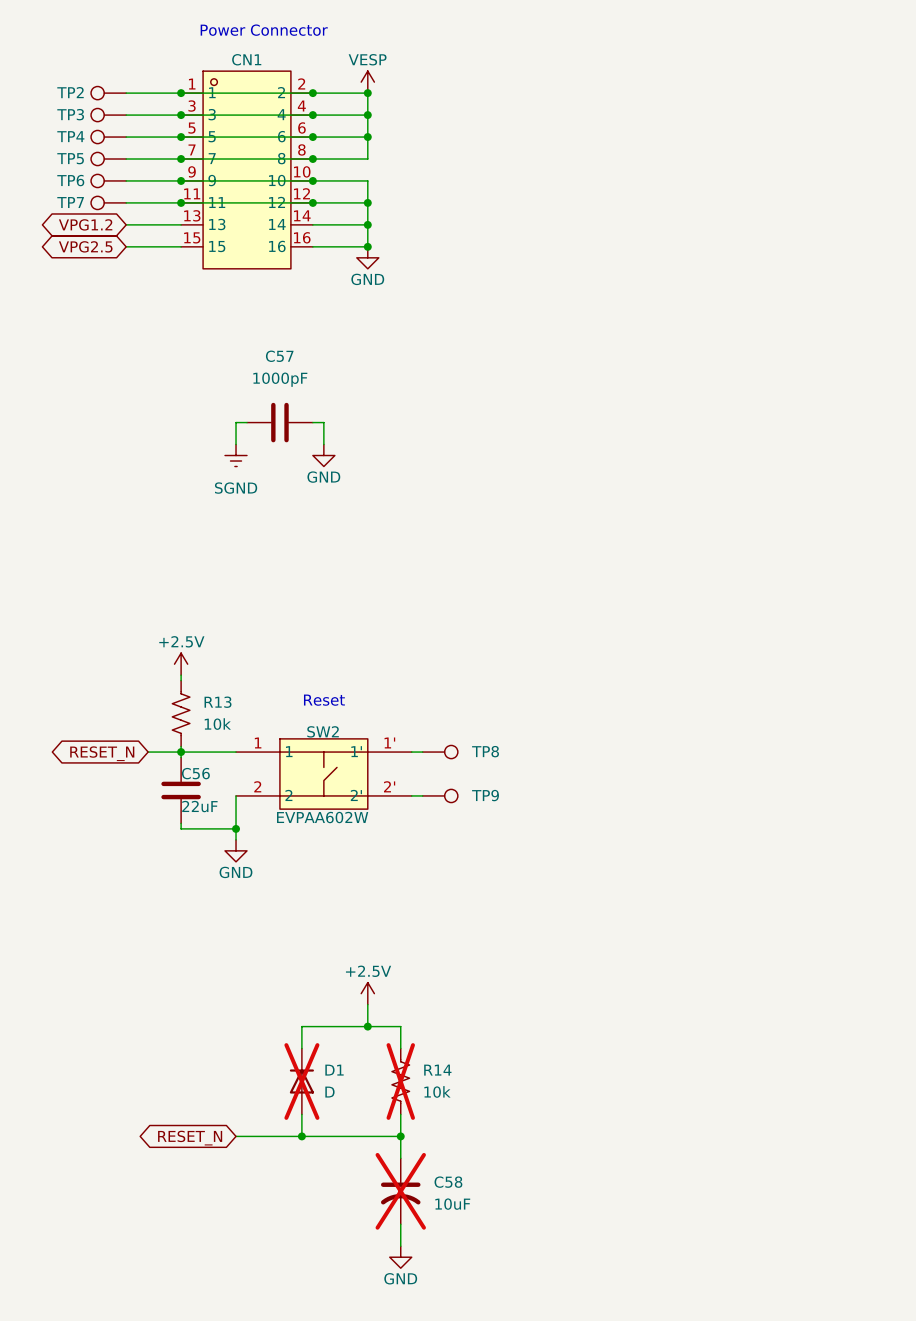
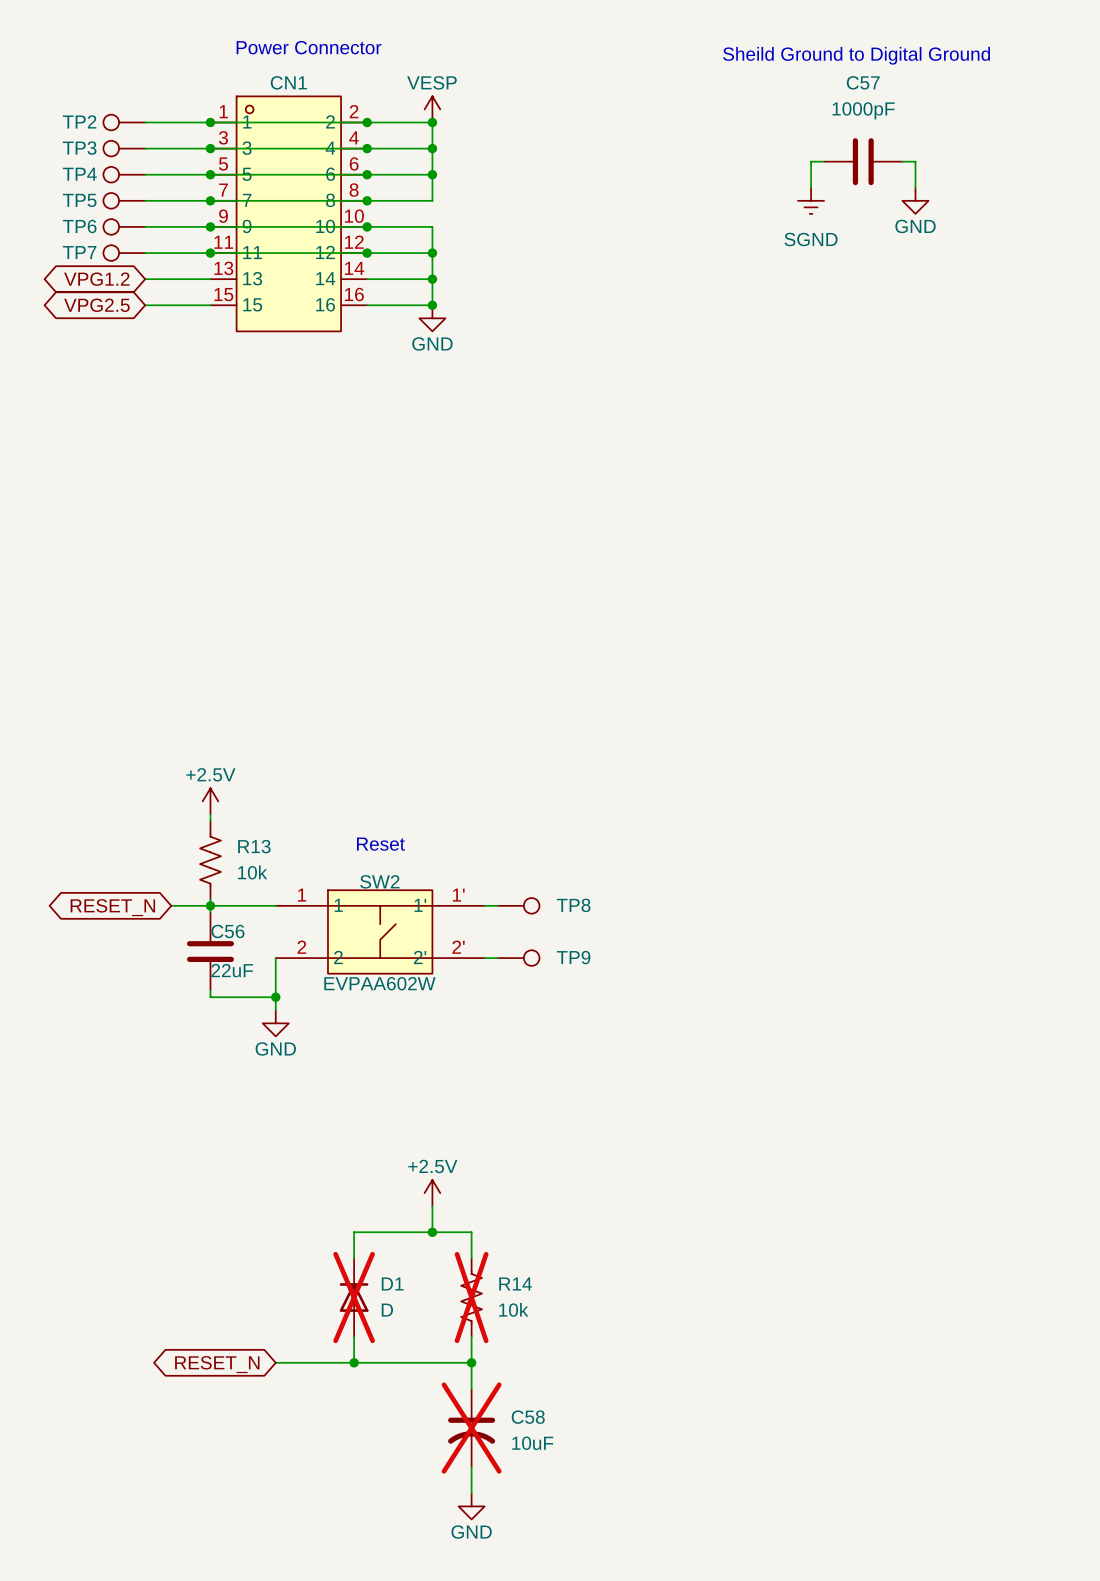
text: none -> Sheild Ground to Digital Ground (856, 55)
wire: none -> (824, 161) (811, 161) (811, 187)
wire: none -> (902, 161) (915, 161) (915, 187)
power symbol: none -> SGND (811, 200)
power symbol: none -> GND (915, 200)
wire: (246, 422) (236, 422) (236, 444) -> none
C57 position: (279, 422) -> (863, 161)
wire: (312, 422) (323, 422) (323, 444) -> none
power symbol: SGND (236, 455) -> none
power symbol: GND (323, 455) -> none

